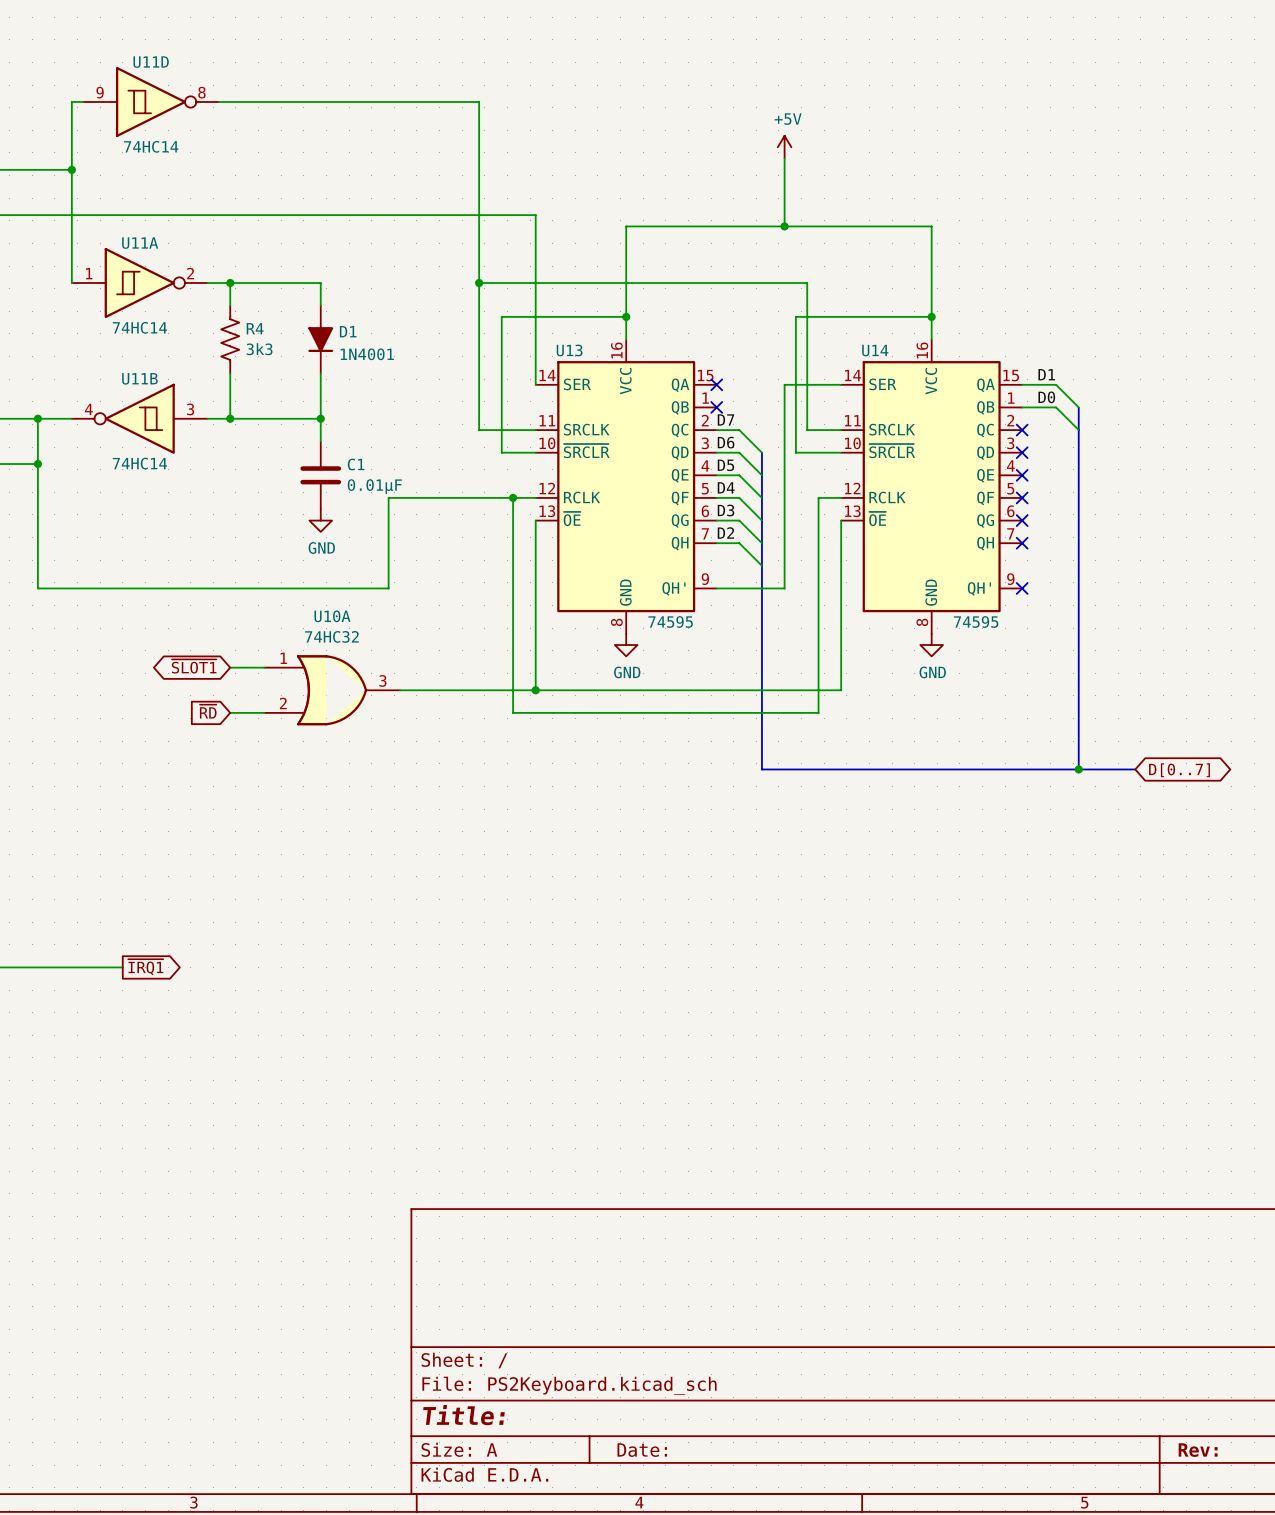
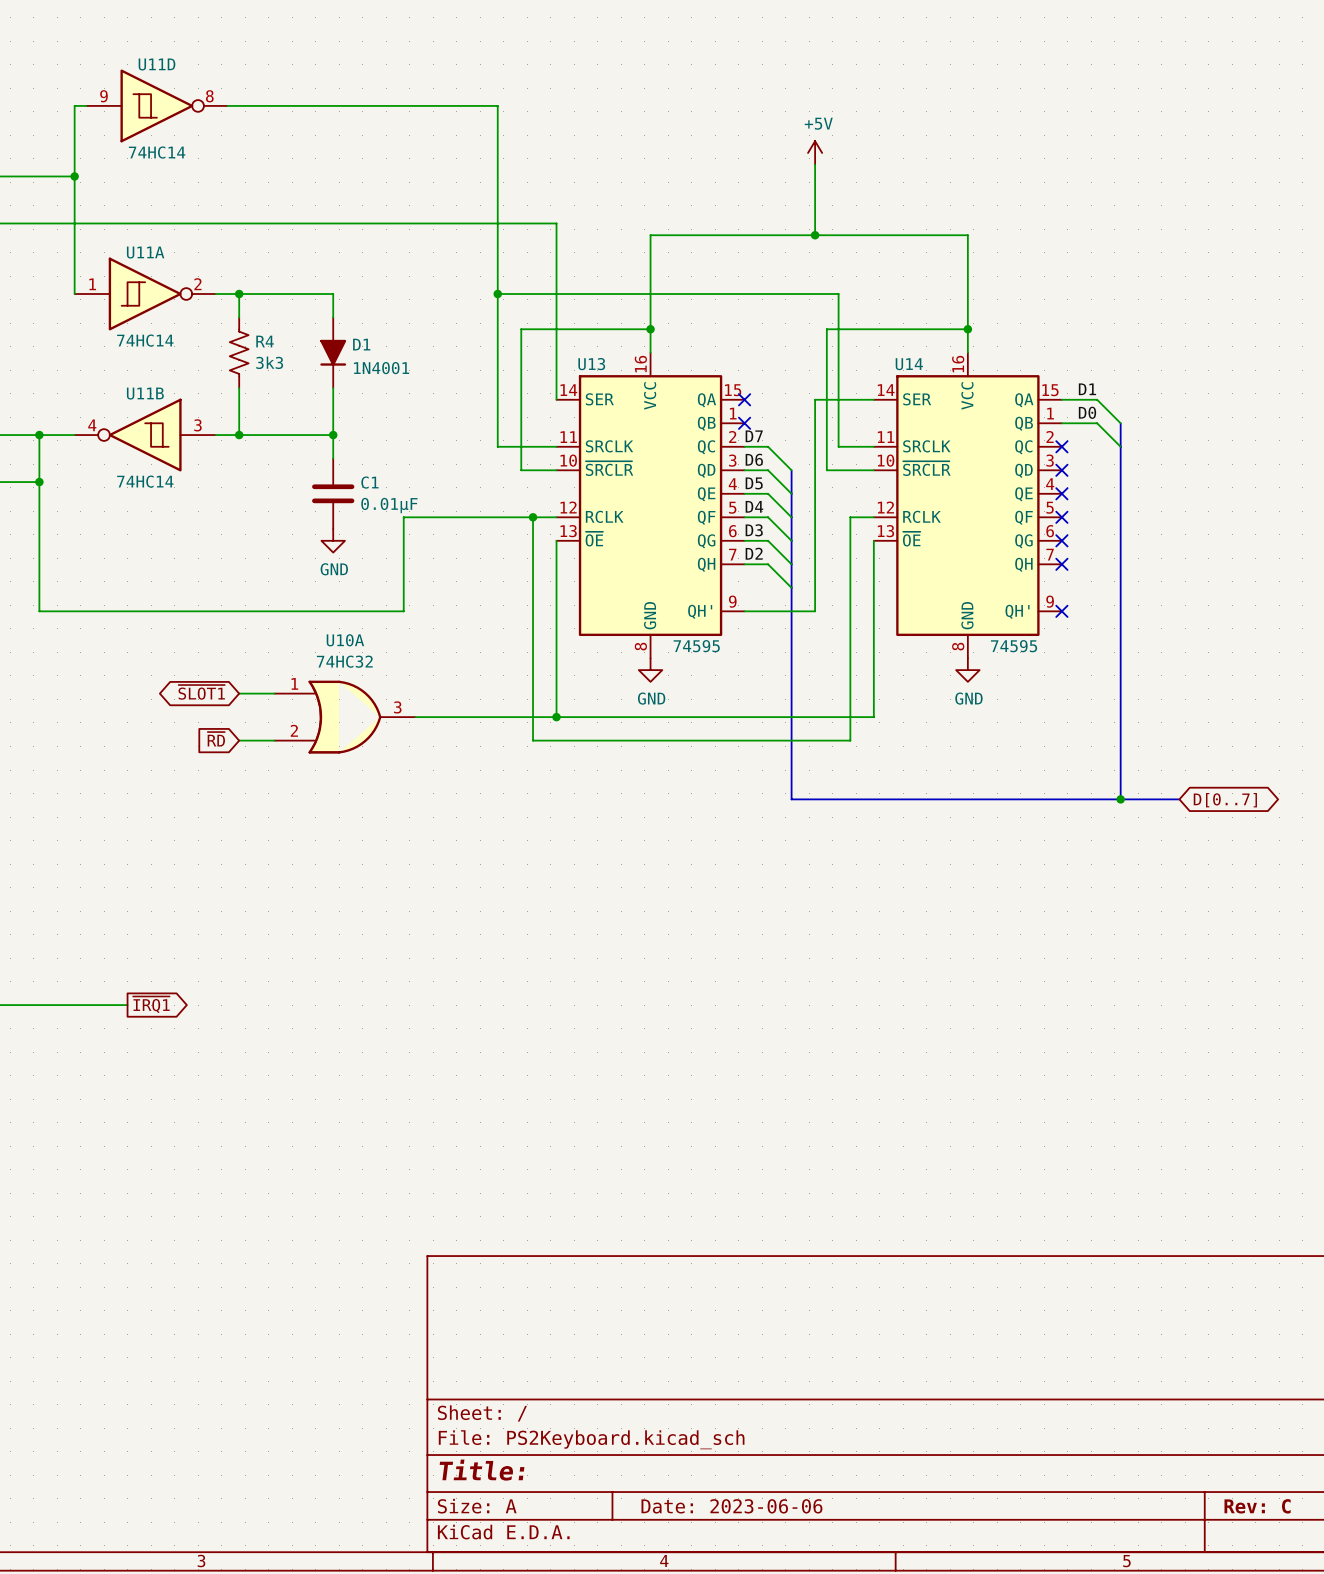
title block: Date: (642, 1450) -> Date: 2023-06-06 (731, 1506)
title block: Rev: (1198, 1450) -> Rev: C (1257, 1506)

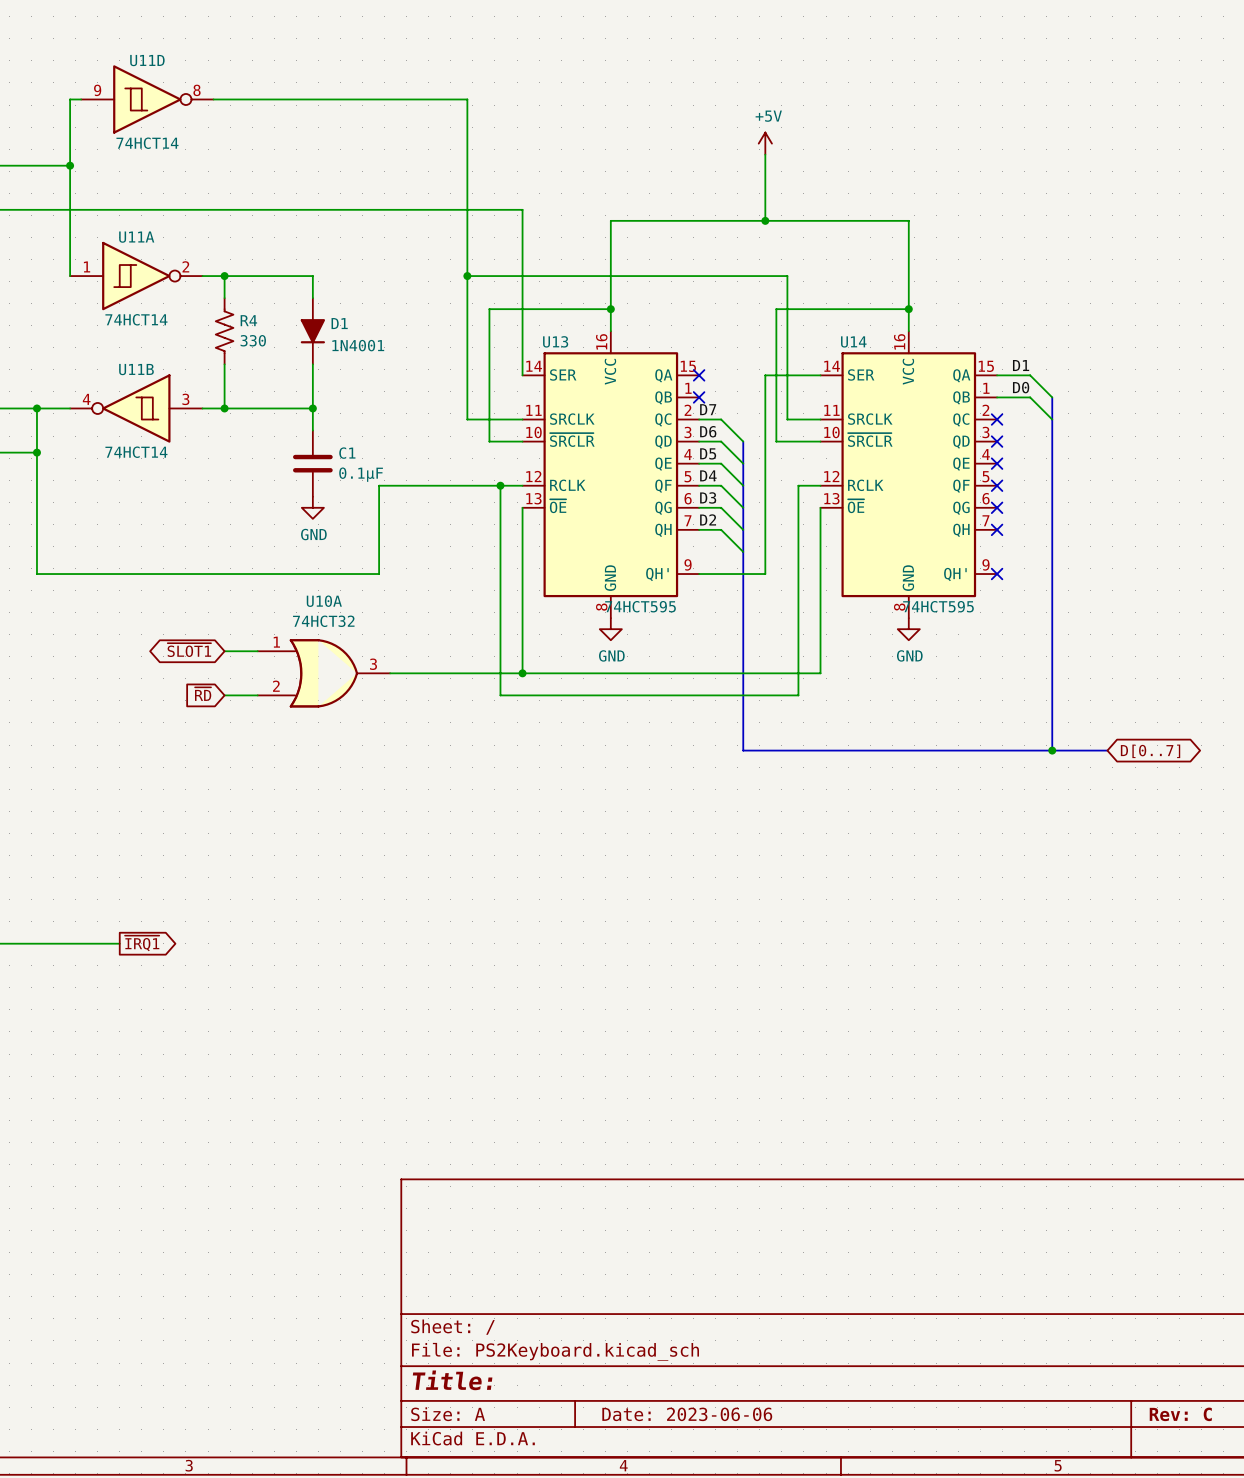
U11D value: 74HC14 (157, 152) -> 74HCT14 (147, 143)
U11A value: 74HC14 (145, 340) -> 74HCT14 (136, 319)
R4 value: 3k3 (269, 362) -> 330 (253, 340)
U11B value: 74HC14 (145, 481) -> 74HCT14 (136, 452)
C1 value: 0.01µF (389, 505) -> 0.1µF (361, 474)
U13 value: 74595 (696, 646) -> 74HCT595 (640, 606)
U14 value: 74595 (1014, 646) -> 74HCT595 (938, 606)
U10A value: 74HC32 (344, 661) -> 74HCT32 (323, 621)

